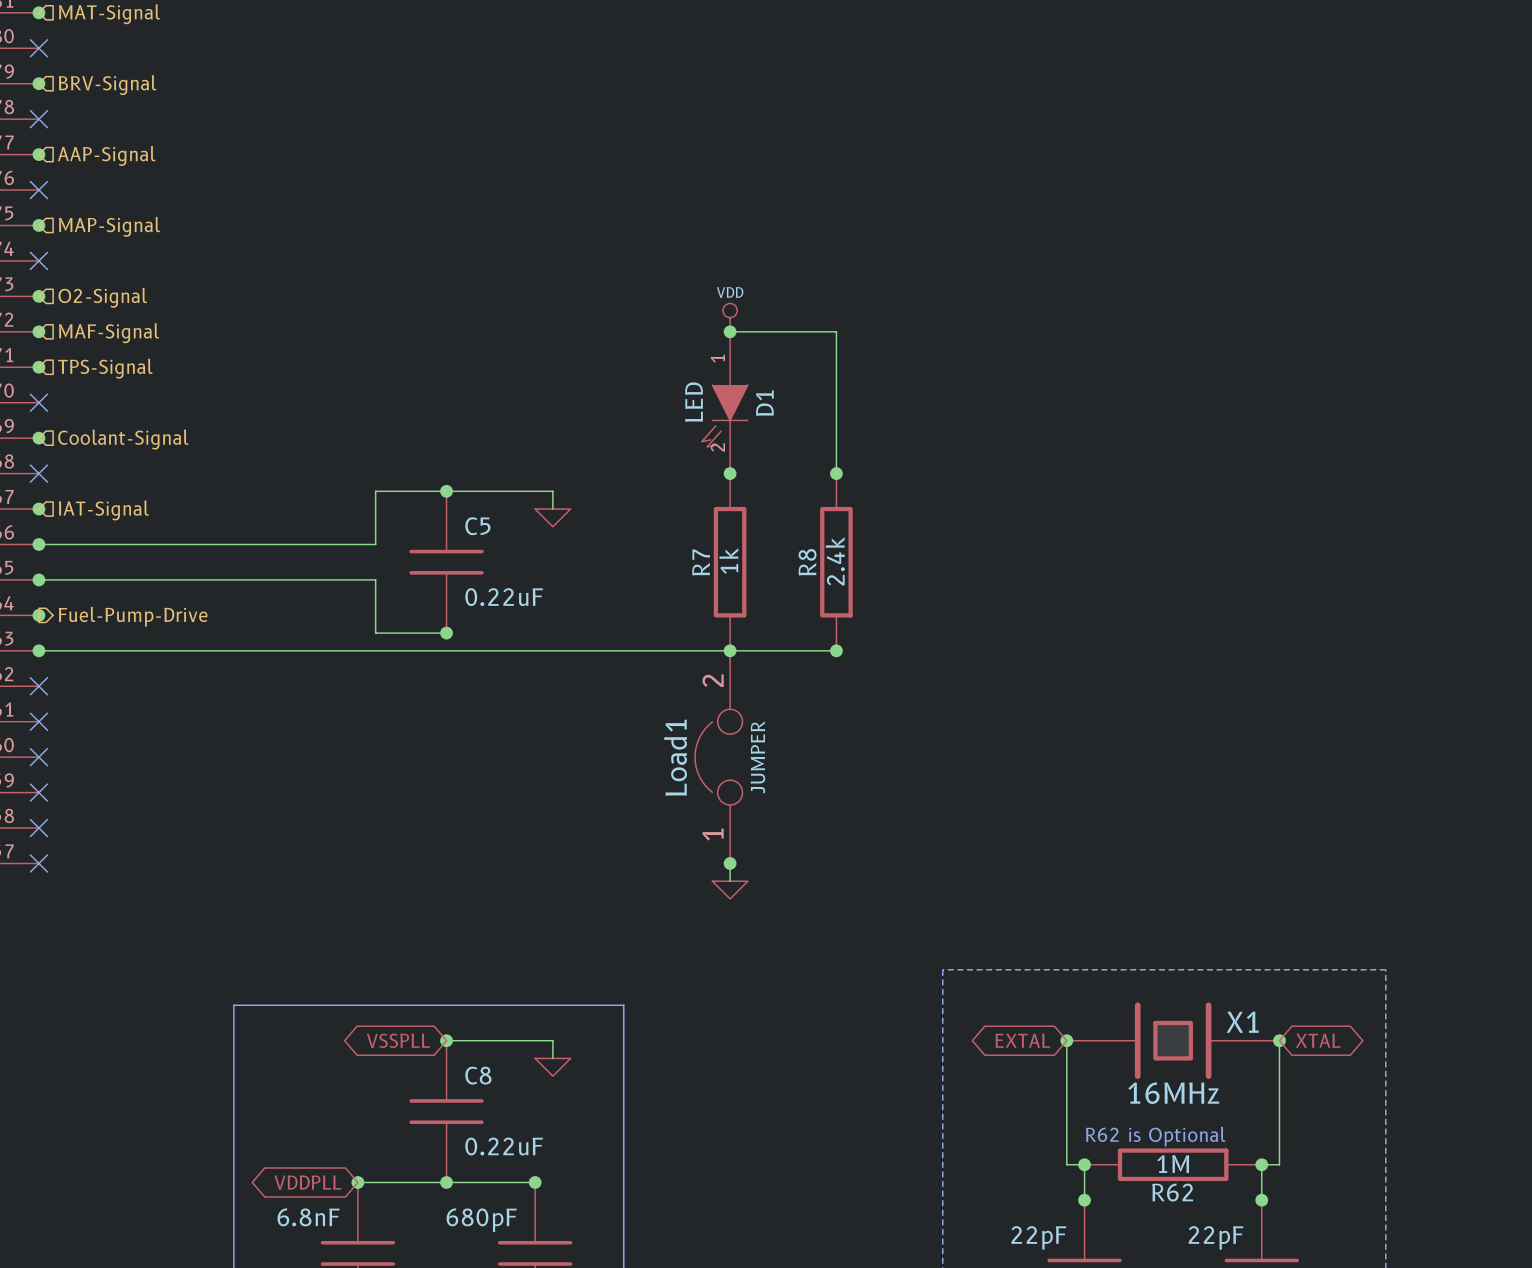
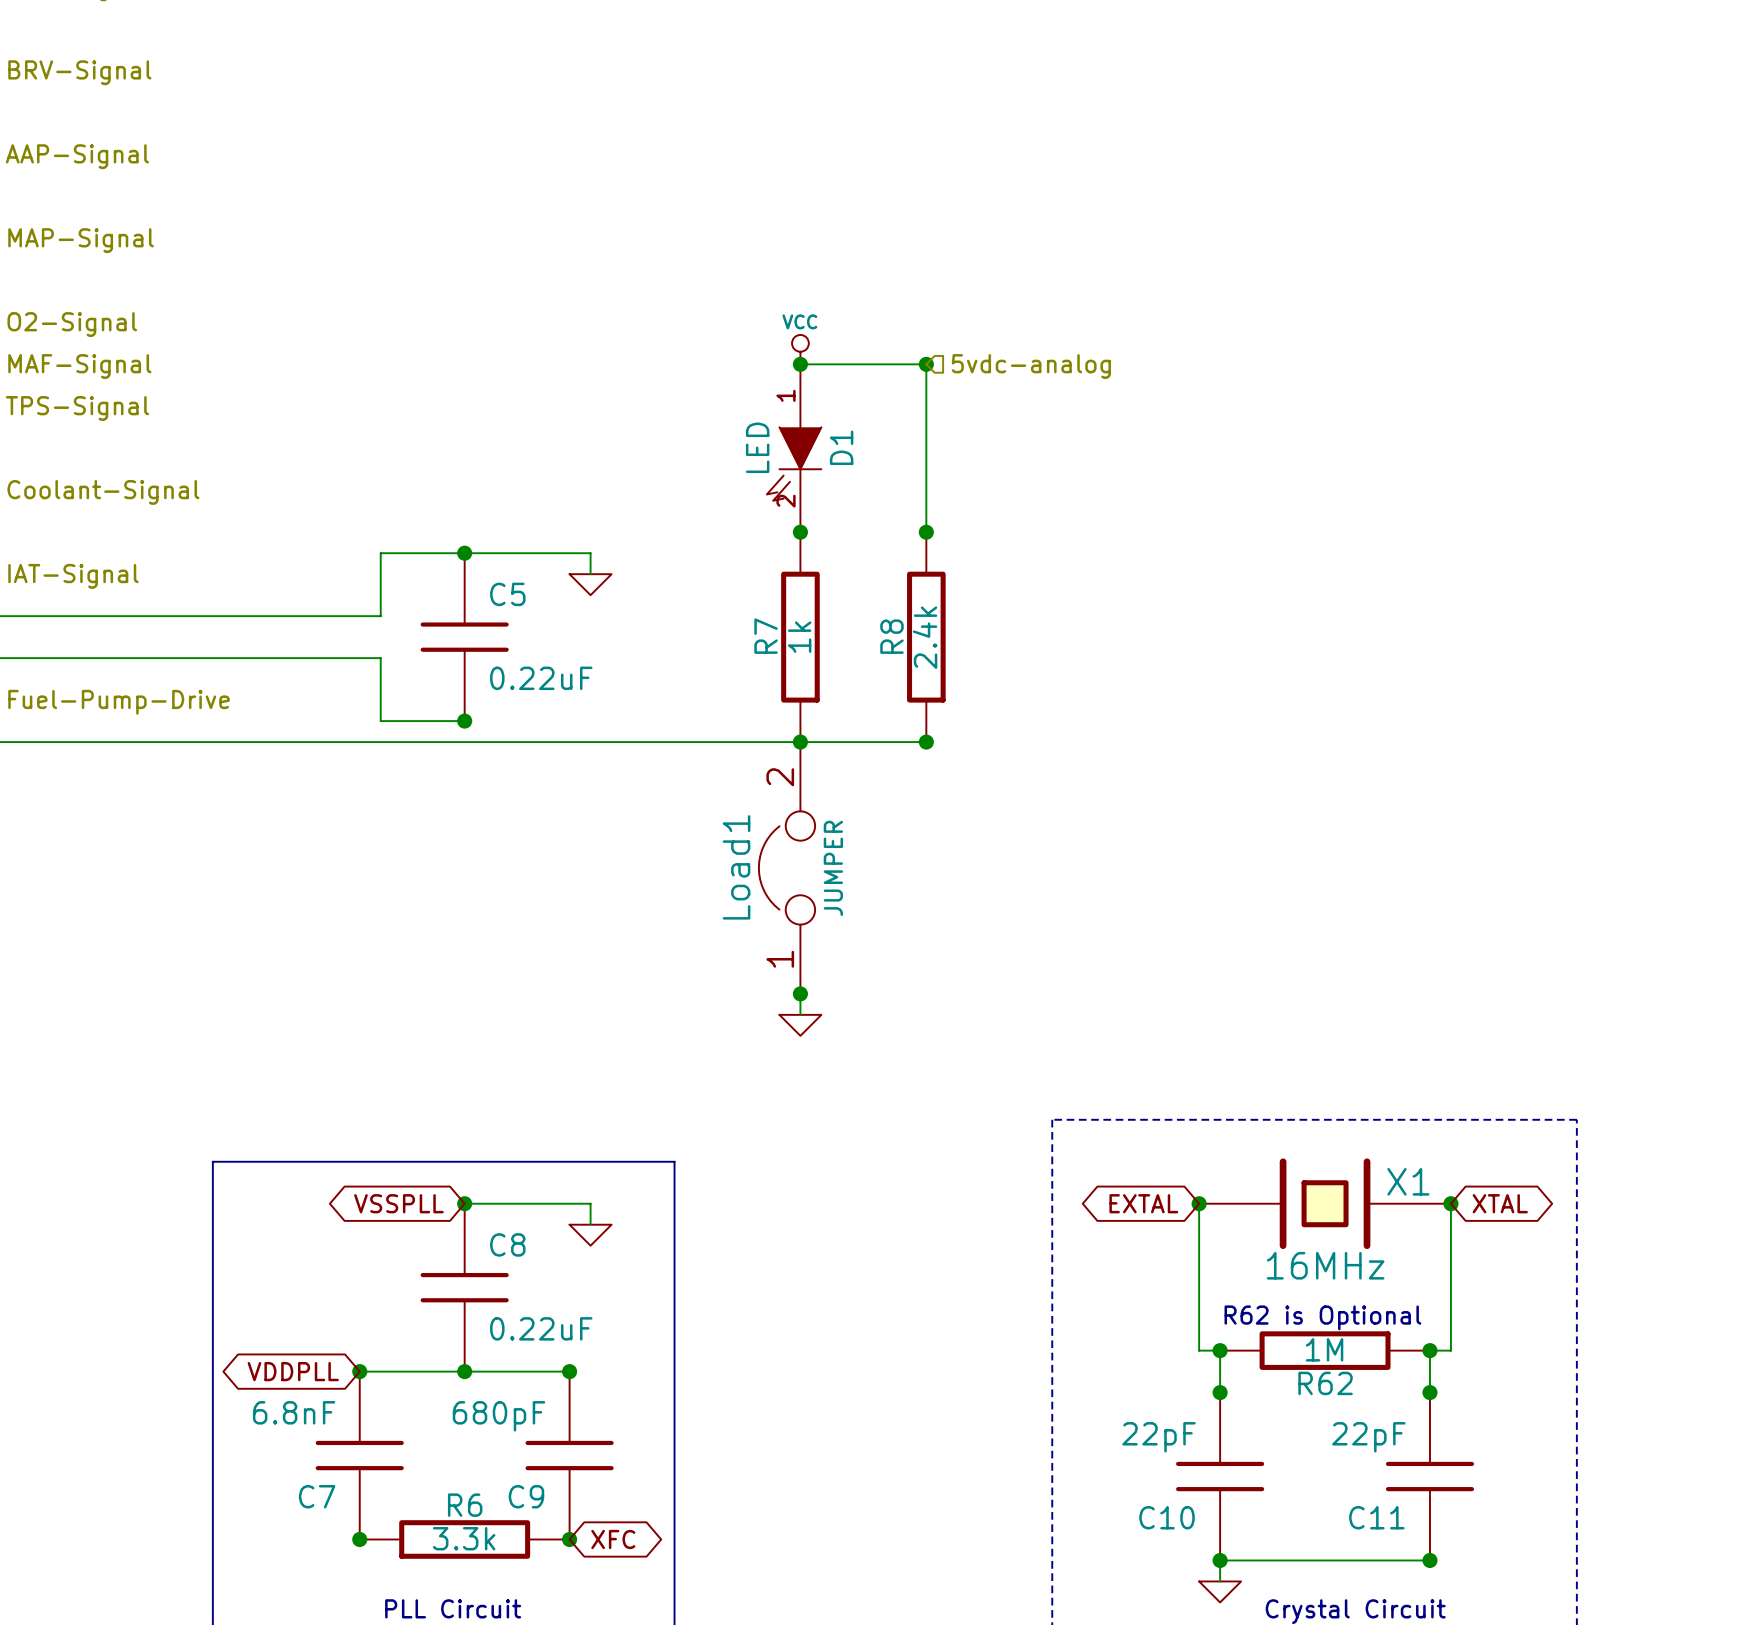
power symbol: VDD (730, 317) -> VCC (800, 349)
junction: none -> (926, 364)
hierarchical label: none -> 5vdc-analog (1031, 366)

